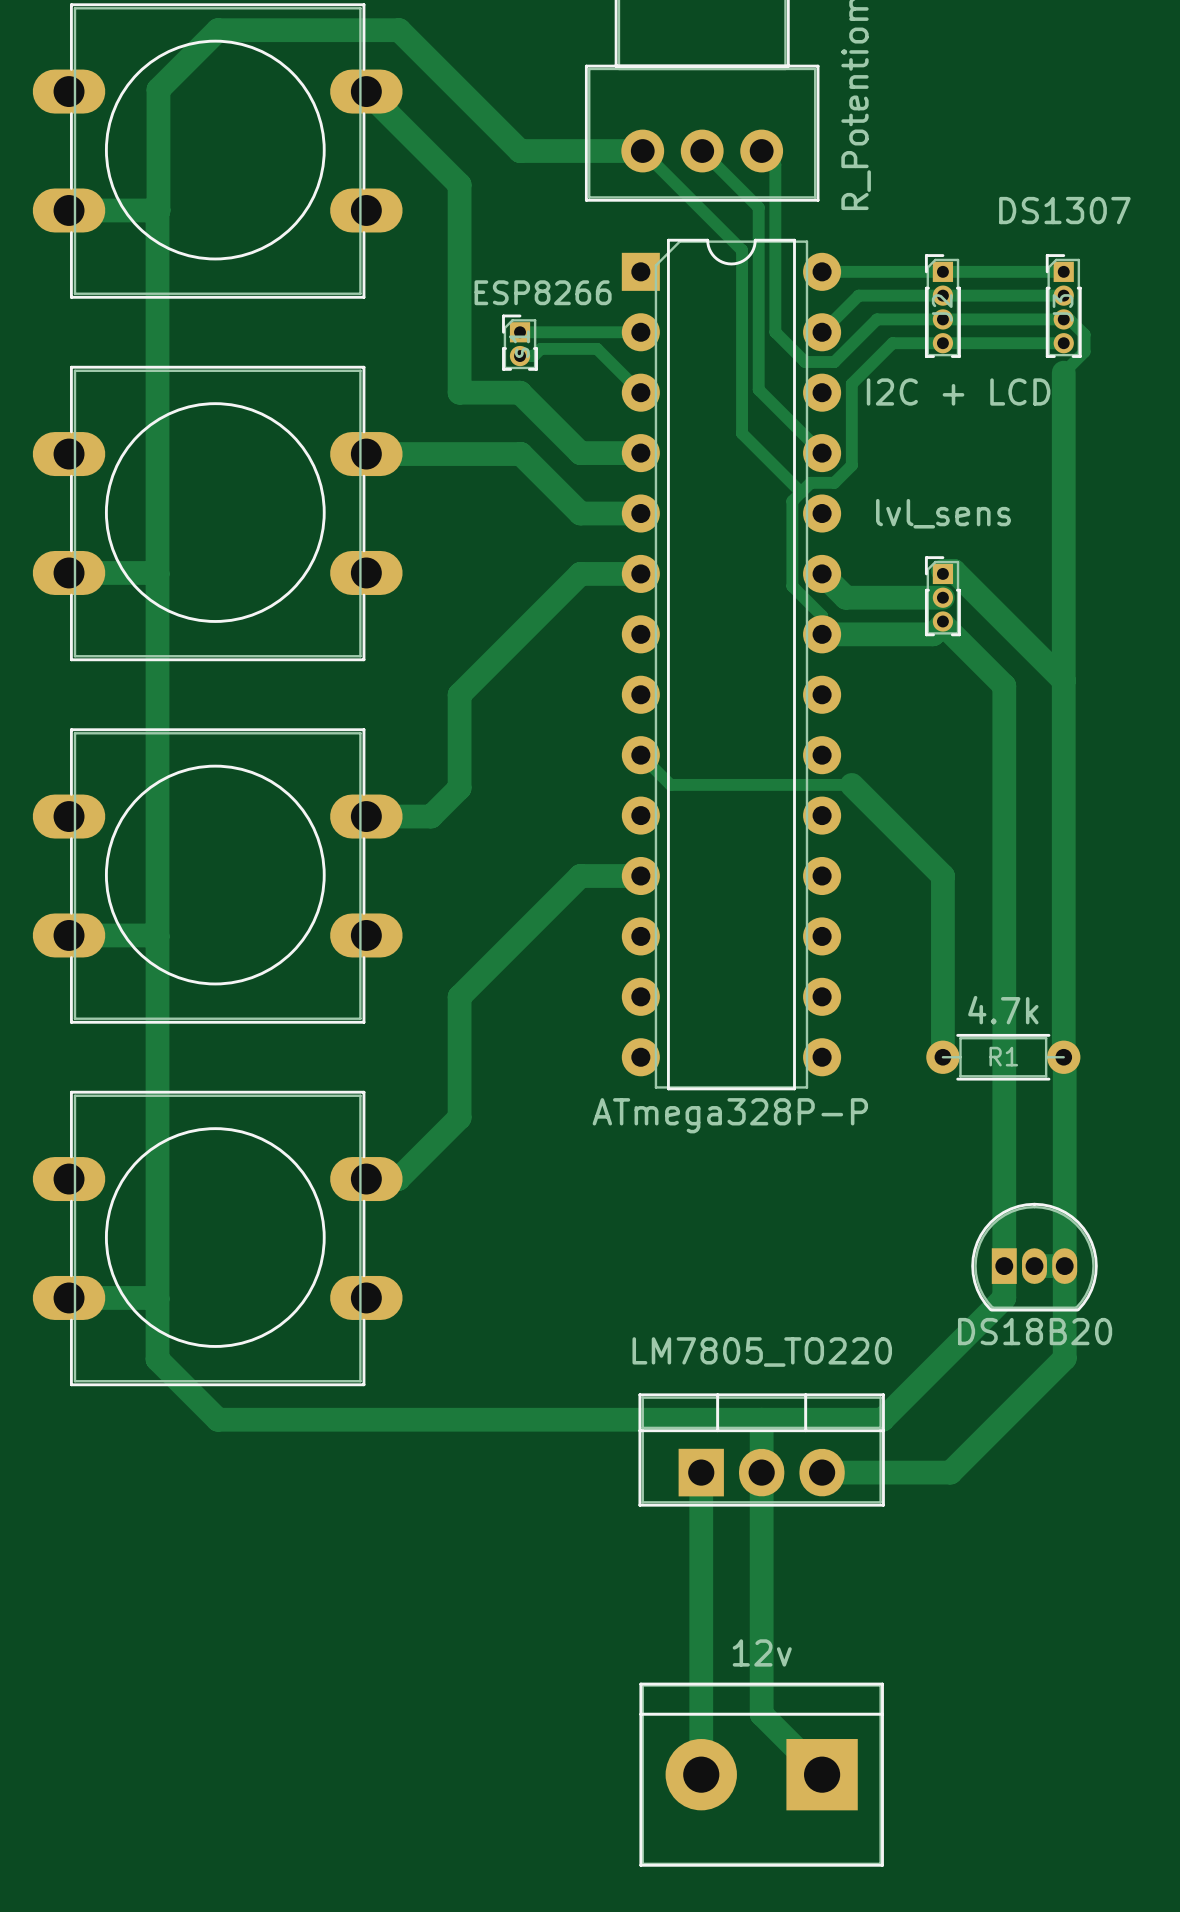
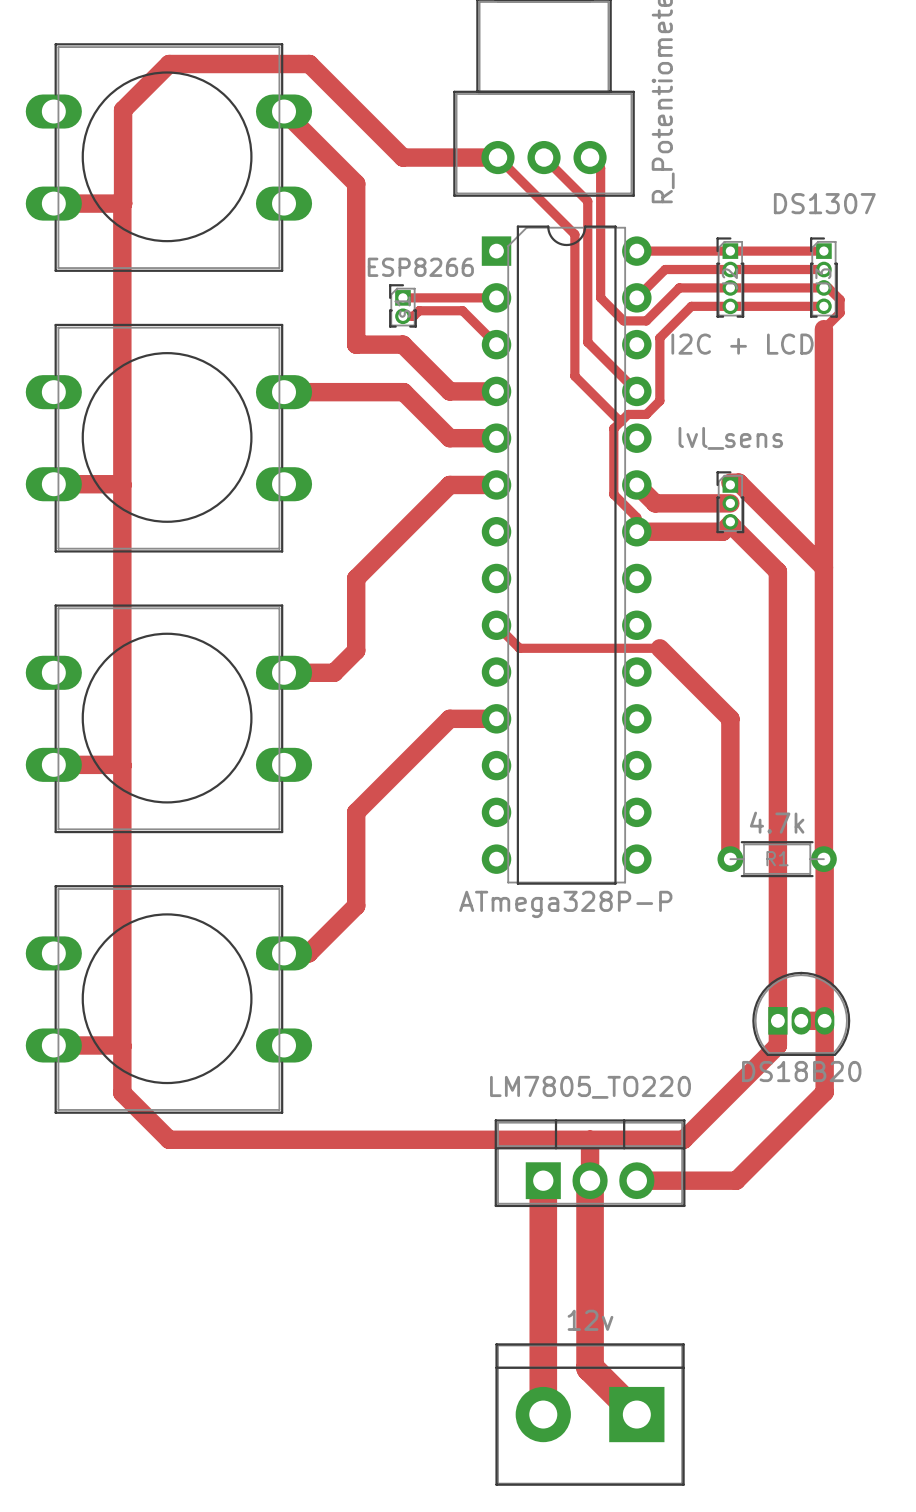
track width: thin (701, 1472) (701, 1774) -> thick (543, 1180) (543, 1414)
track width: thin (761, 1472) (761, 1714) (822, 1774) -> thick (590, 1180) (590, 1367) (636, 1414)

